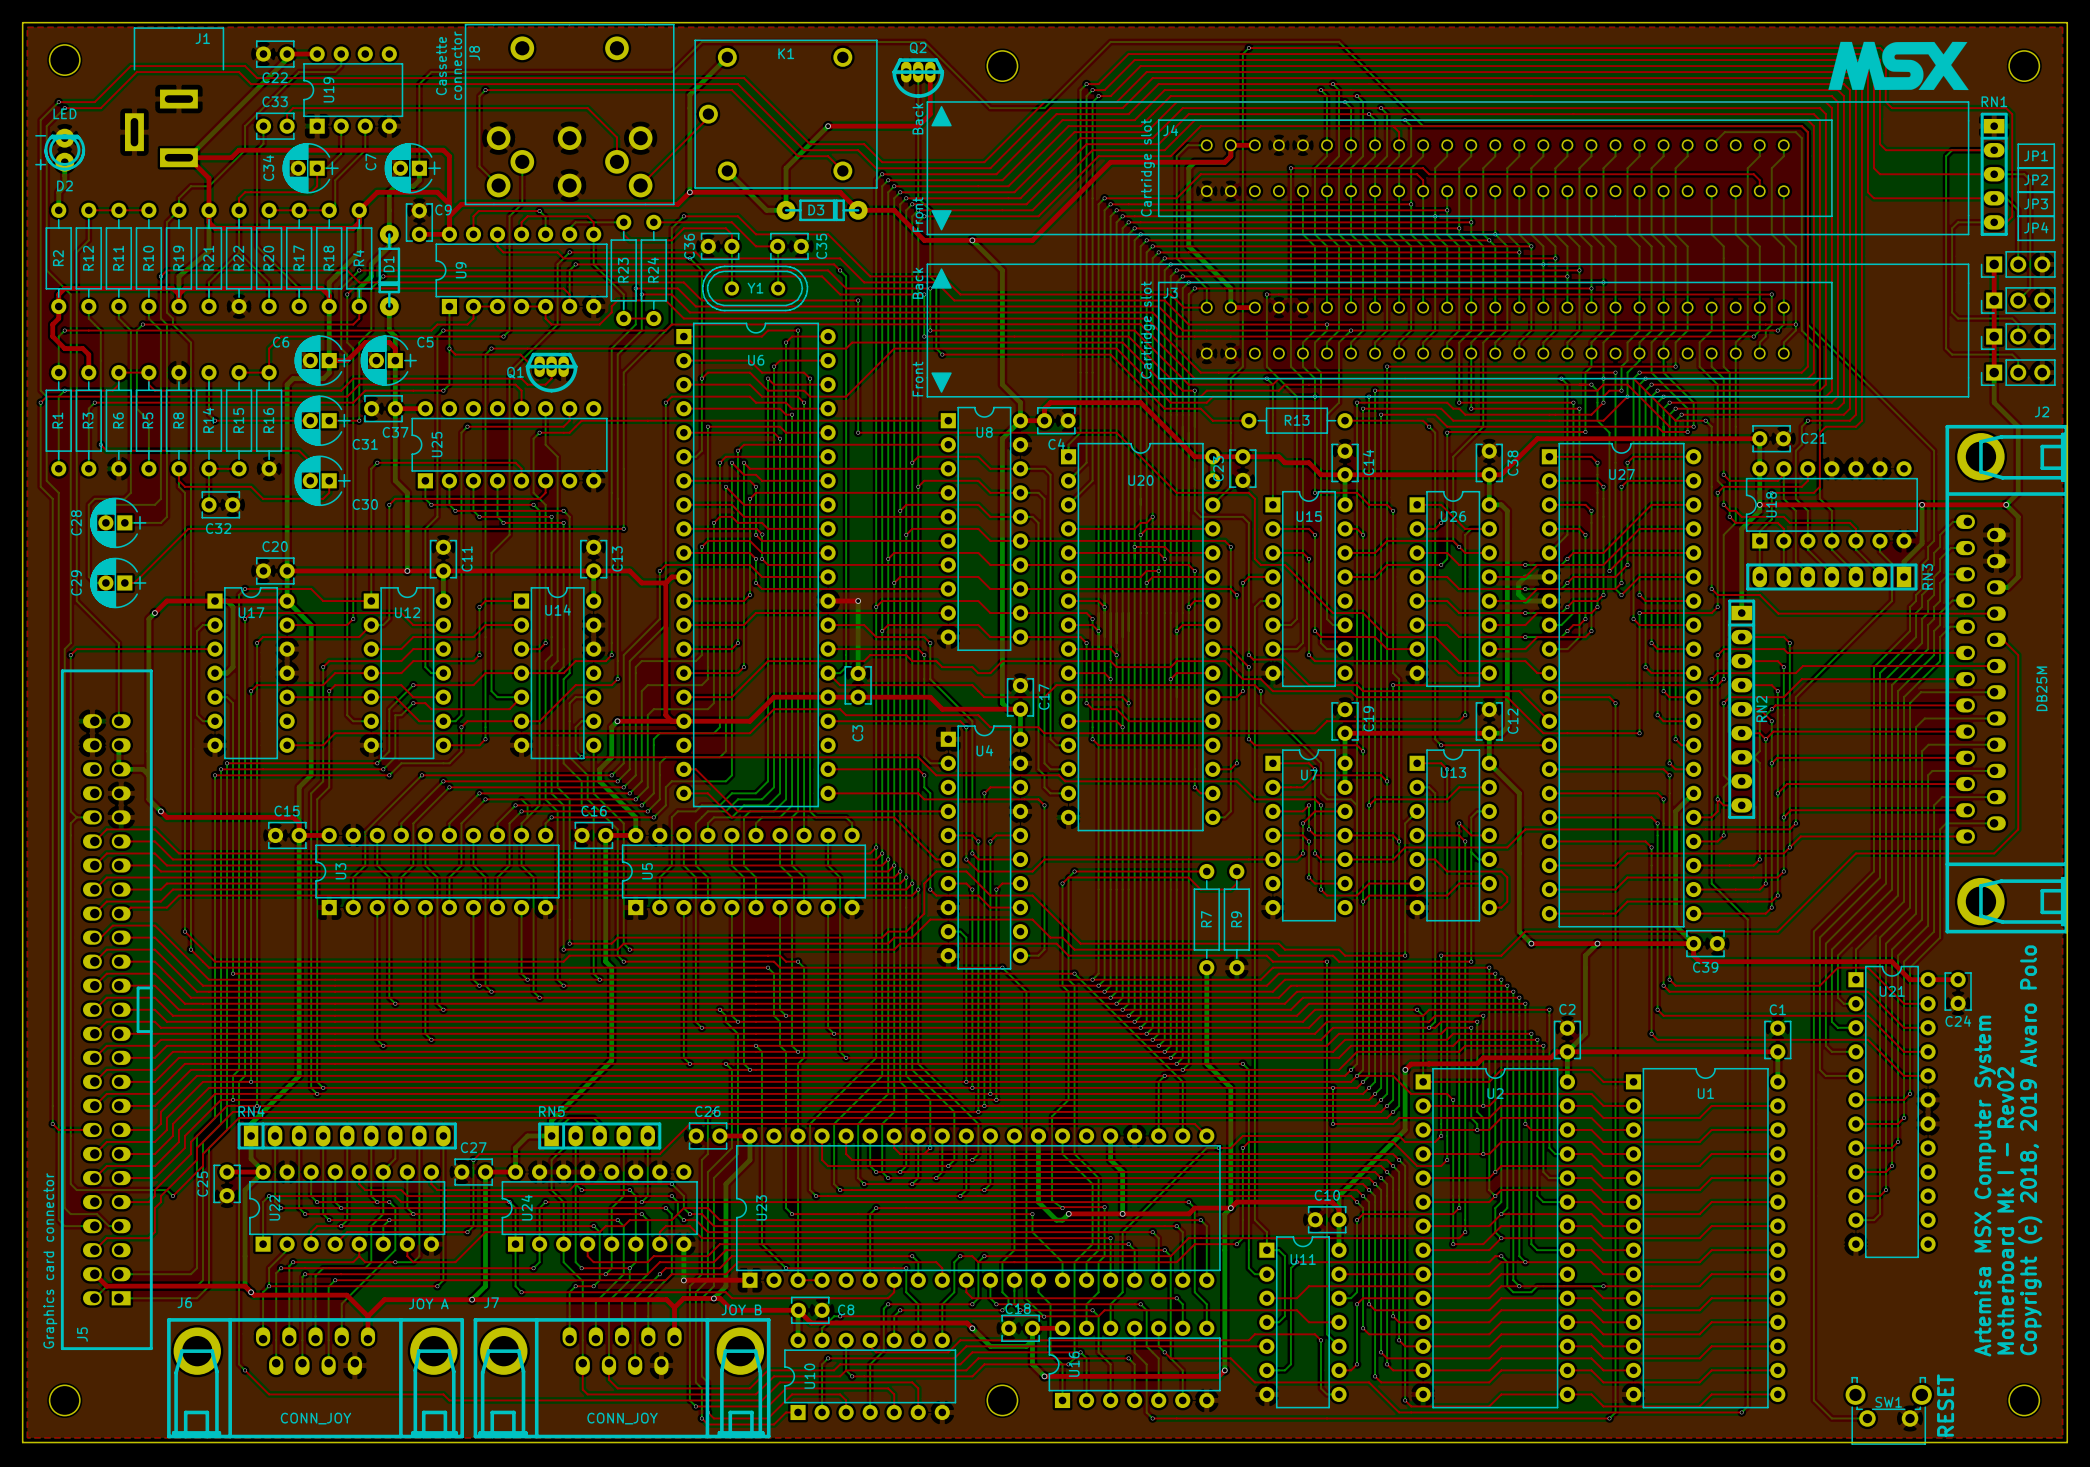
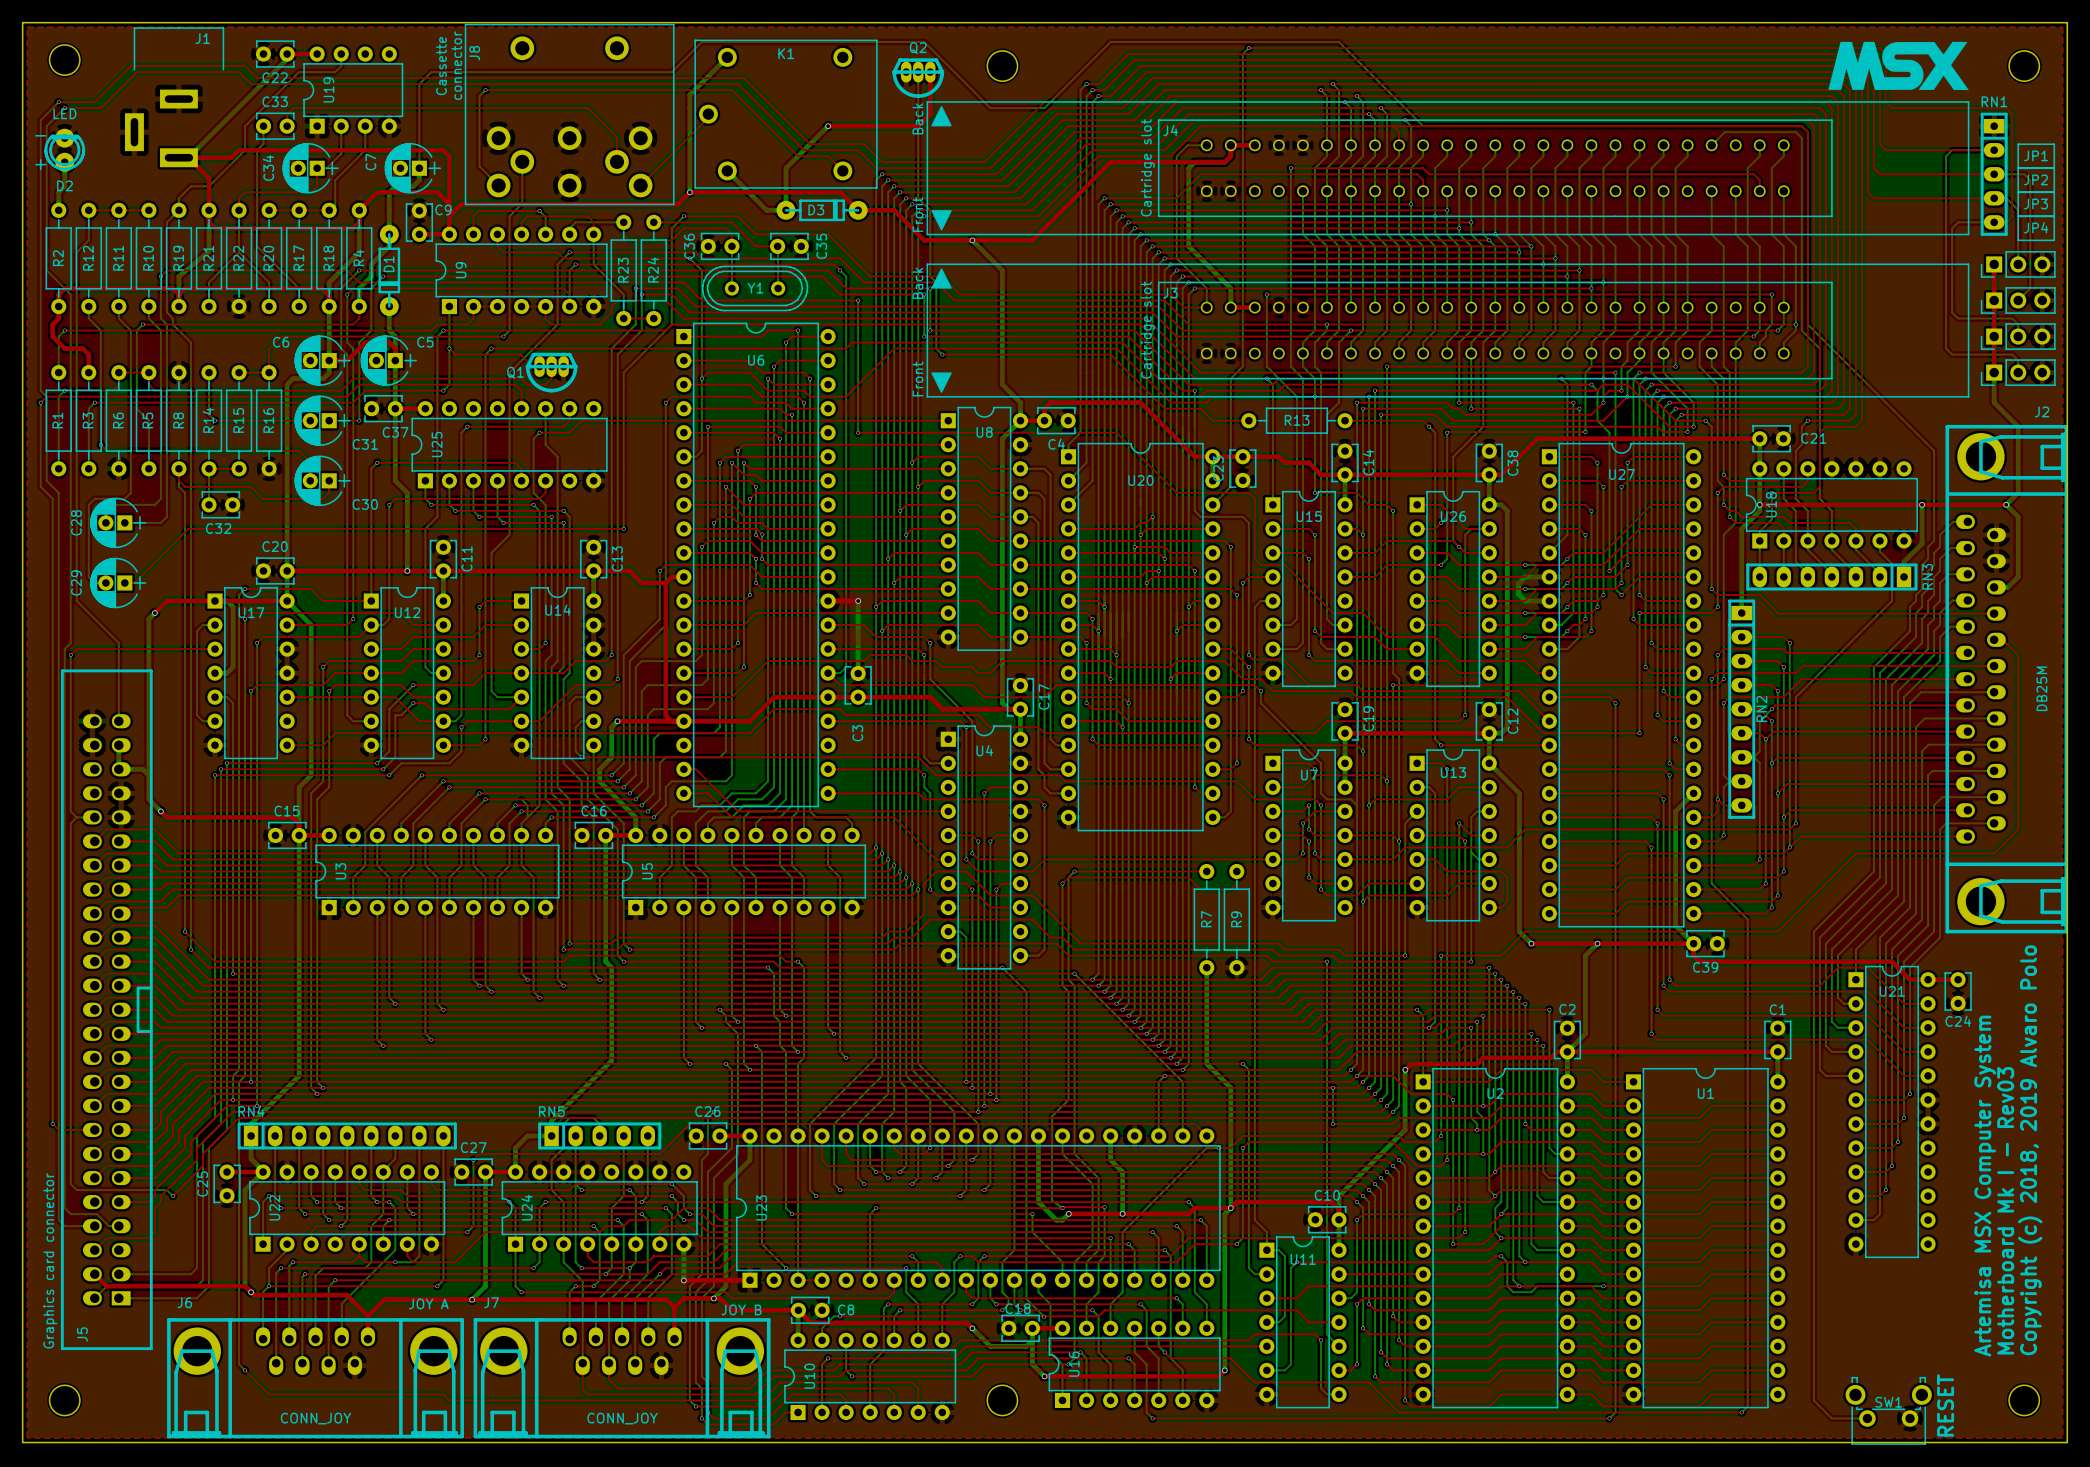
text: Motherboard Mk I - Rev02 (2005, 1210) -> Motherboard Mk I - Rev03 (2005, 1210)

